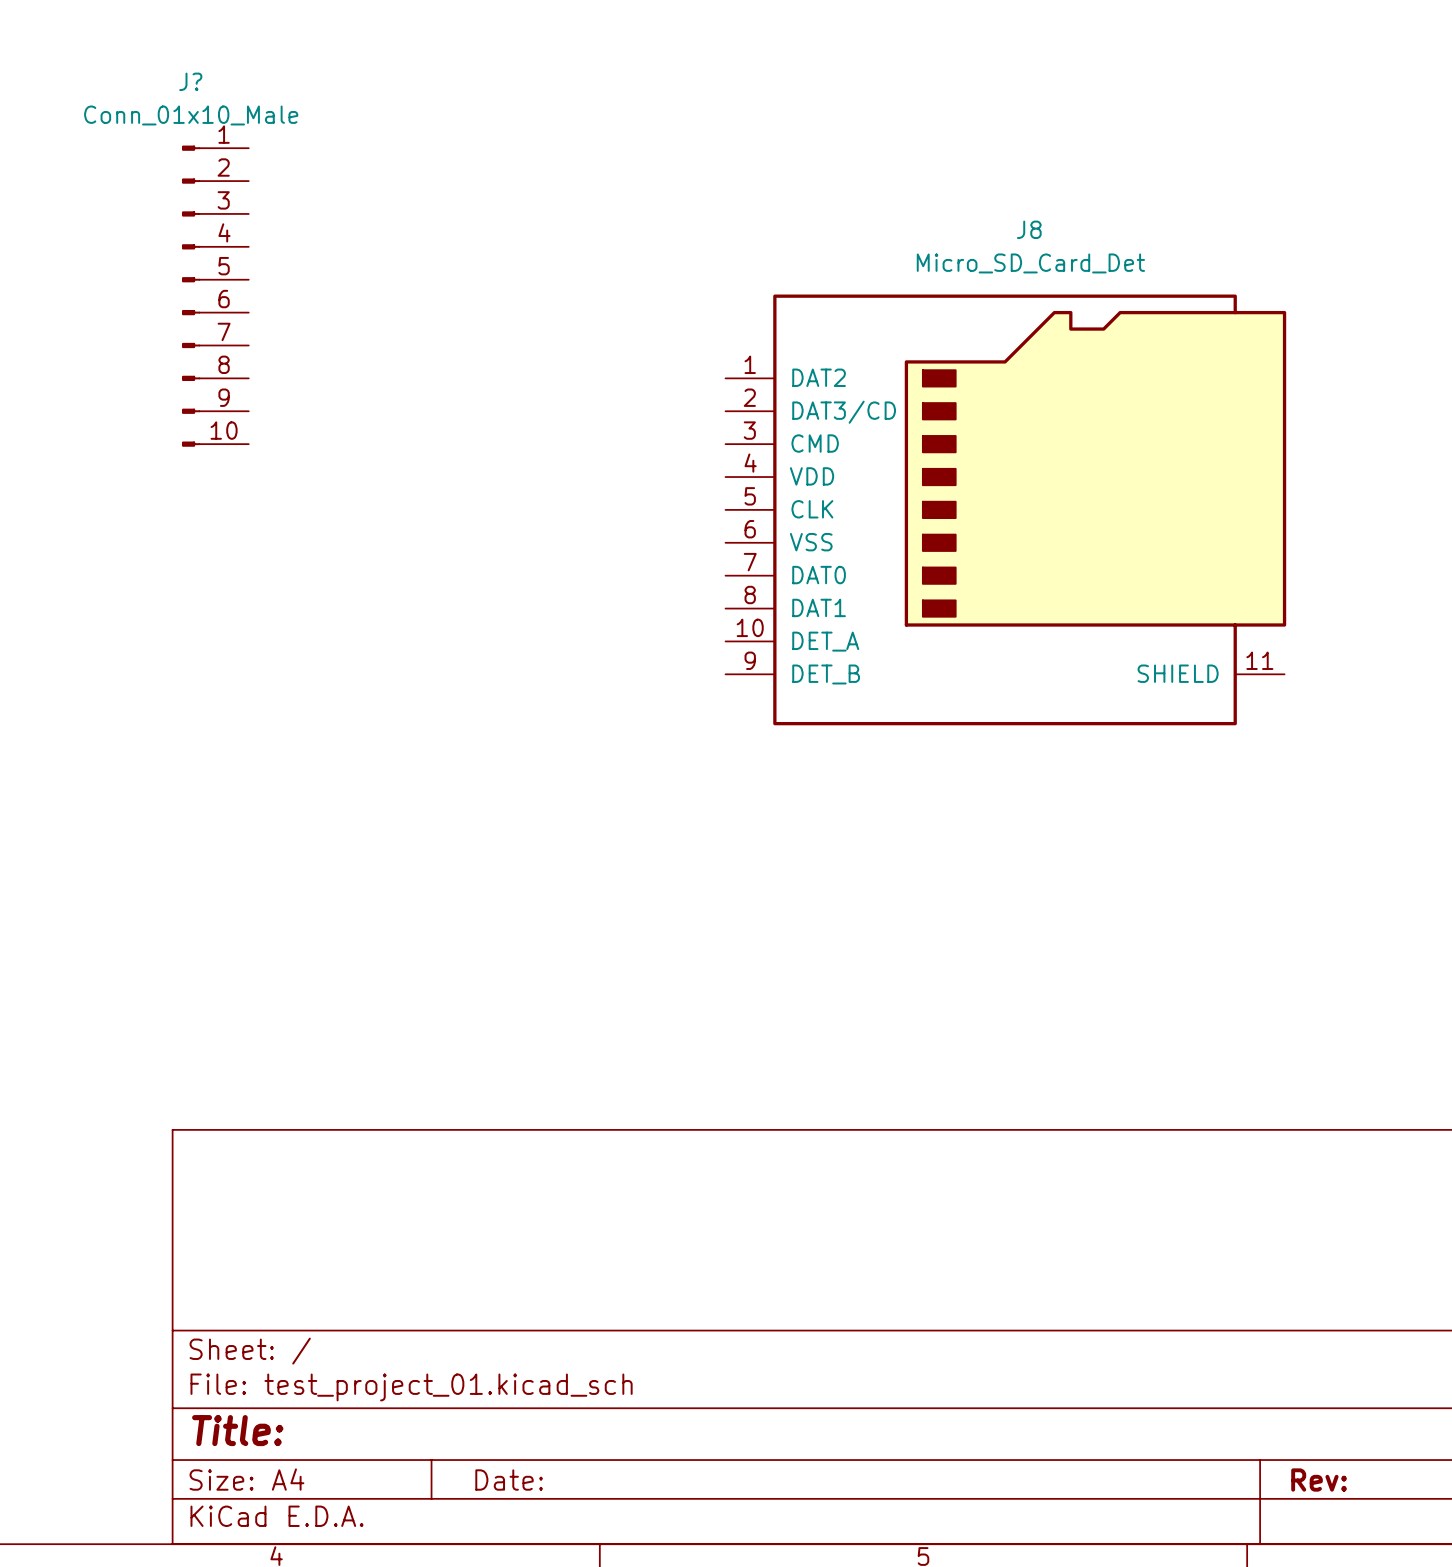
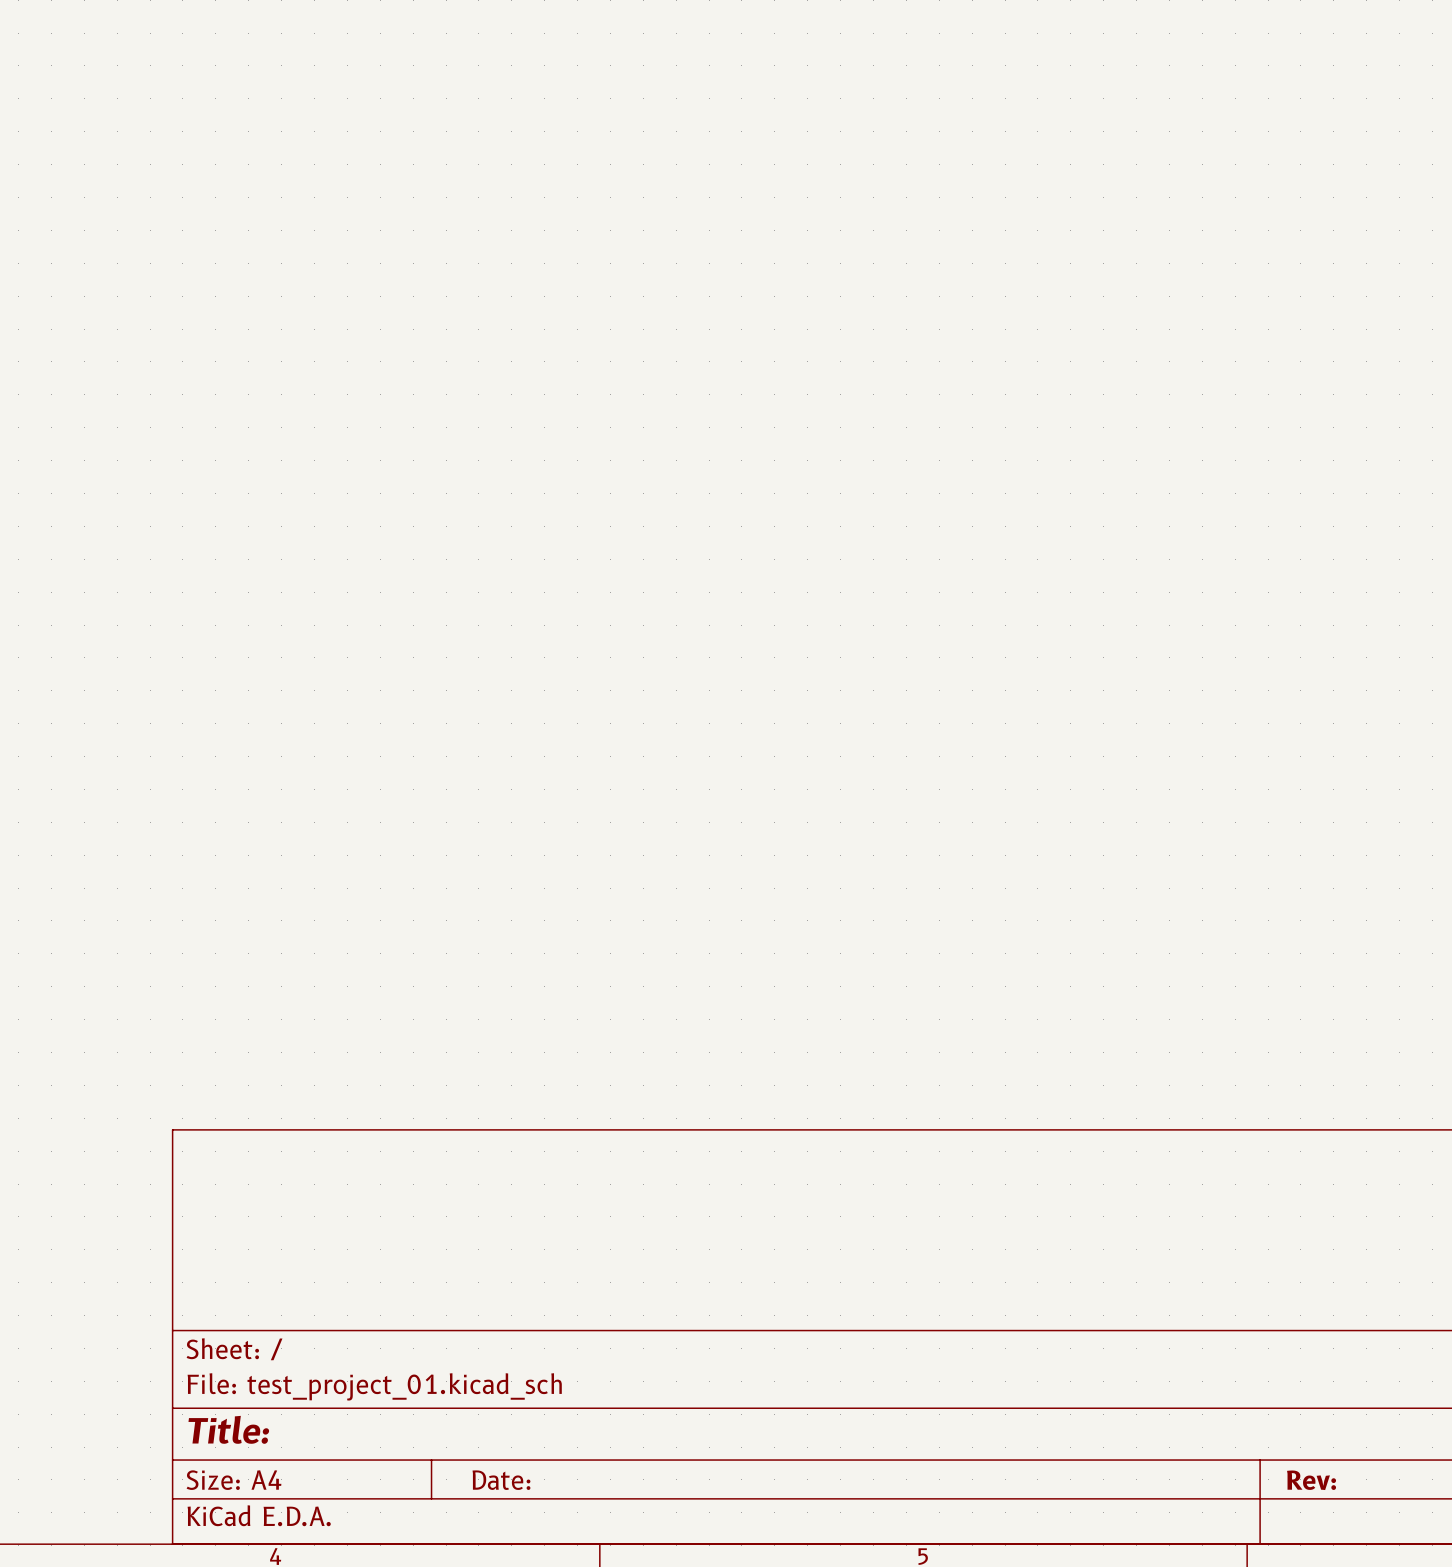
J?: Conn_01x10_Male (215, 296) -> none
J8: Micro_SD_Card_Det (1005, 509) -> none

